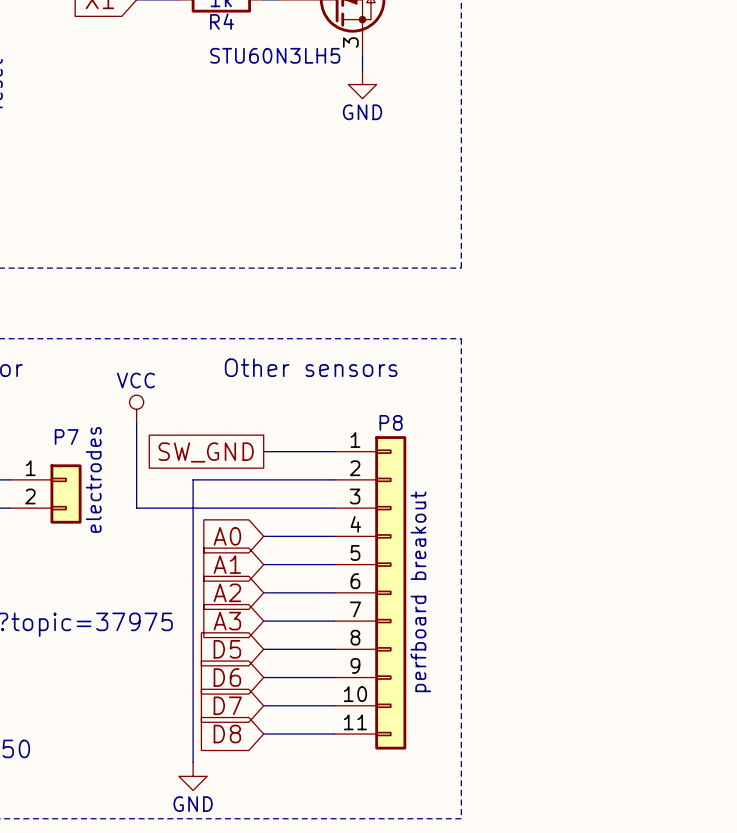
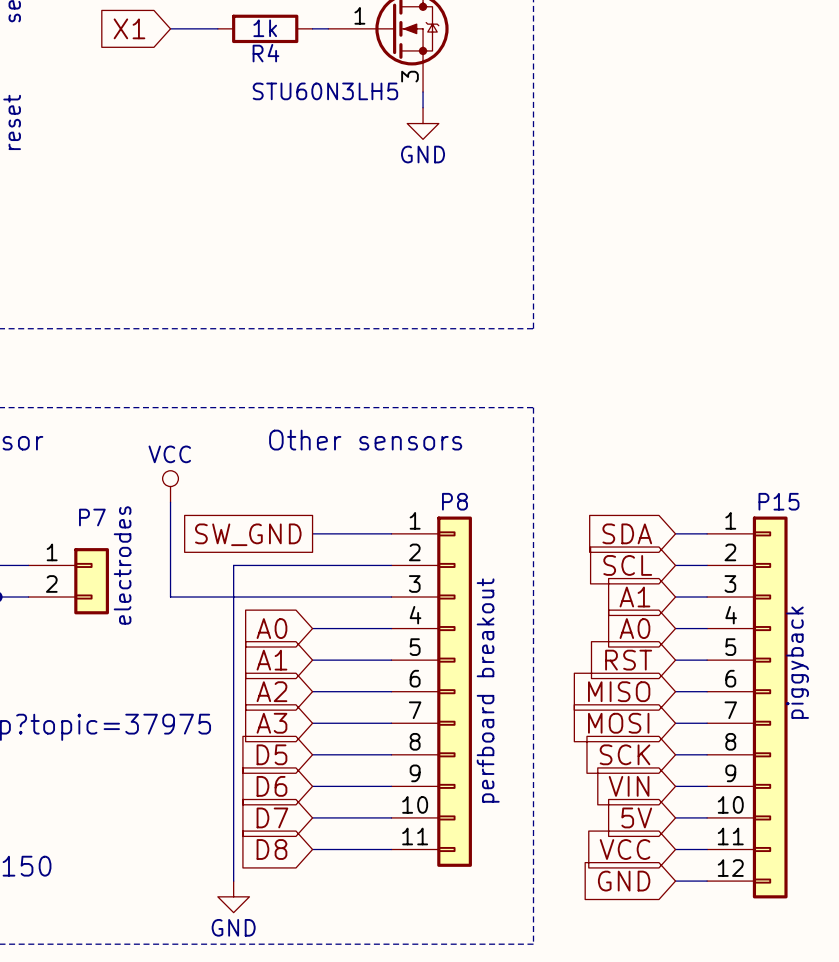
global label: none -> SDA (627, 533)
wire: none -> (675, 533) (707, 533)
global label: none -> SCL (627, 565)
wire: none -> (675, 565) (707, 565)
global label: none -> A1 (634, 597)
wire: none -> (675, 597) (707, 597)
global label: none -> A0 (634, 628)
wire: none -> (675, 628) (707, 628)
global label: none -> RST (628, 660)
wire: none -> (675, 660) (707, 660)
global label: none -> MISO (619, 691)
wire: none -> (675, 691) (707, 691)
P15: none -> piggyback (747, 707)
global label: none -> MOSI (618, 723)
wire: none -> (675, 723) (707, 723)
global label: none -> SCK (625, 754)
wire: none -> (675, 754) (707, 754)
global label: none -> VIN (629, 786)
wire: none -> (675, 786) (707, 786)
global label: none -> 5V (636, 817)
wire: none -> (675, 817) (707, 817)
global label: none -> VCC (625, 849)
wire: none -> (675, 849) (707, 849)
global label: none -> GND (624, 881)
wire: none -> (675, 881) (707, 881)

